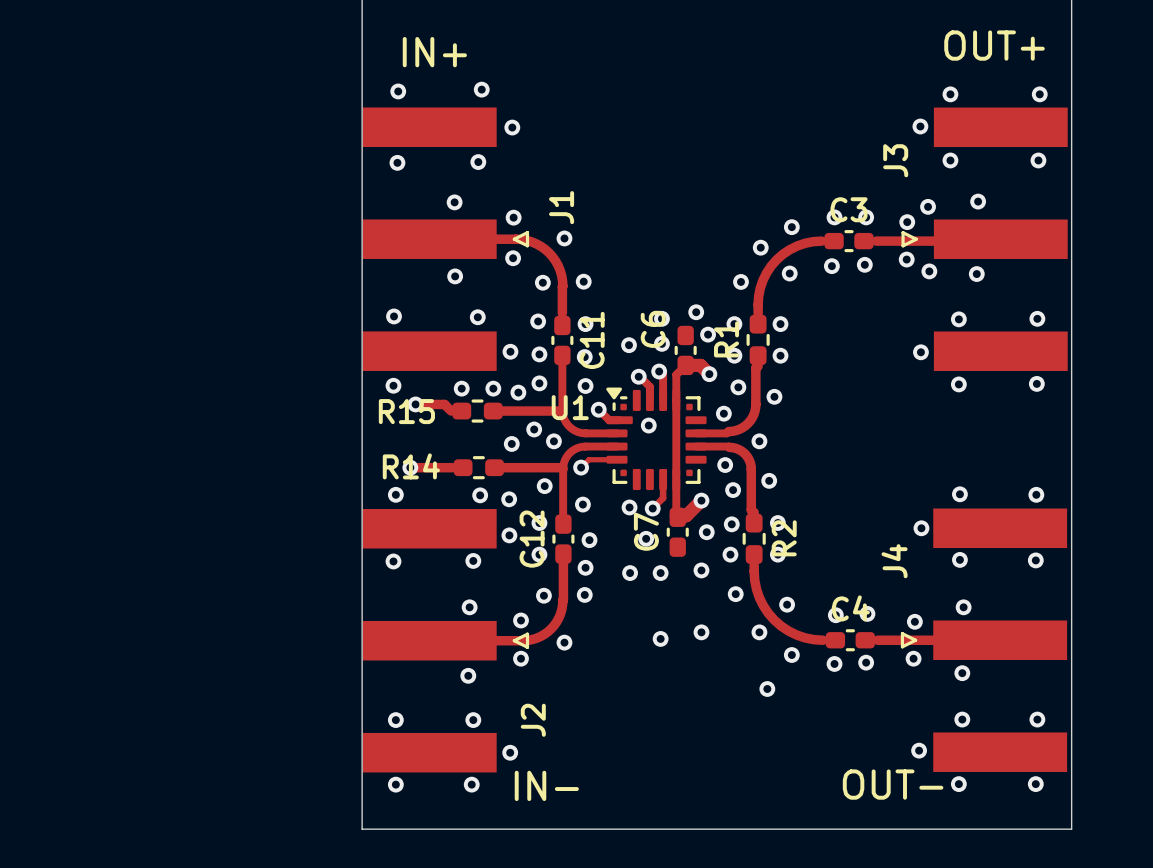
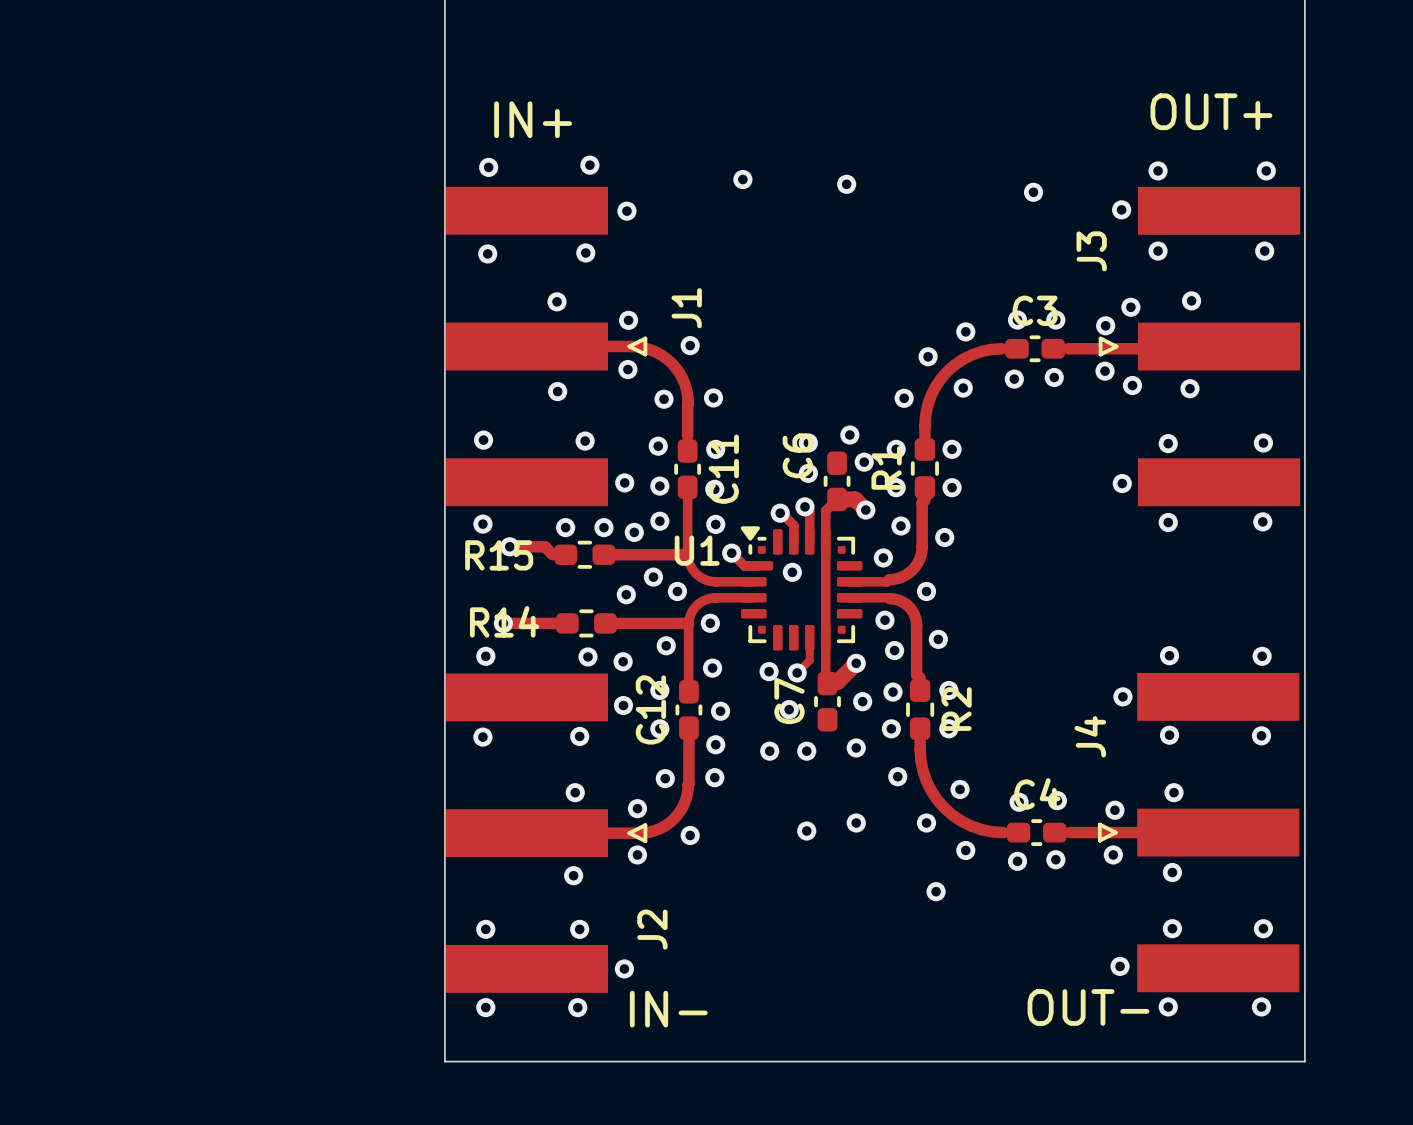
via: none -> (742, 179)
via: none -> (846, 184)
via: none -> (1033, 192)
via: (629, 345) -> none
track: (617, 459) (588, 459) (581, 467) -> none

